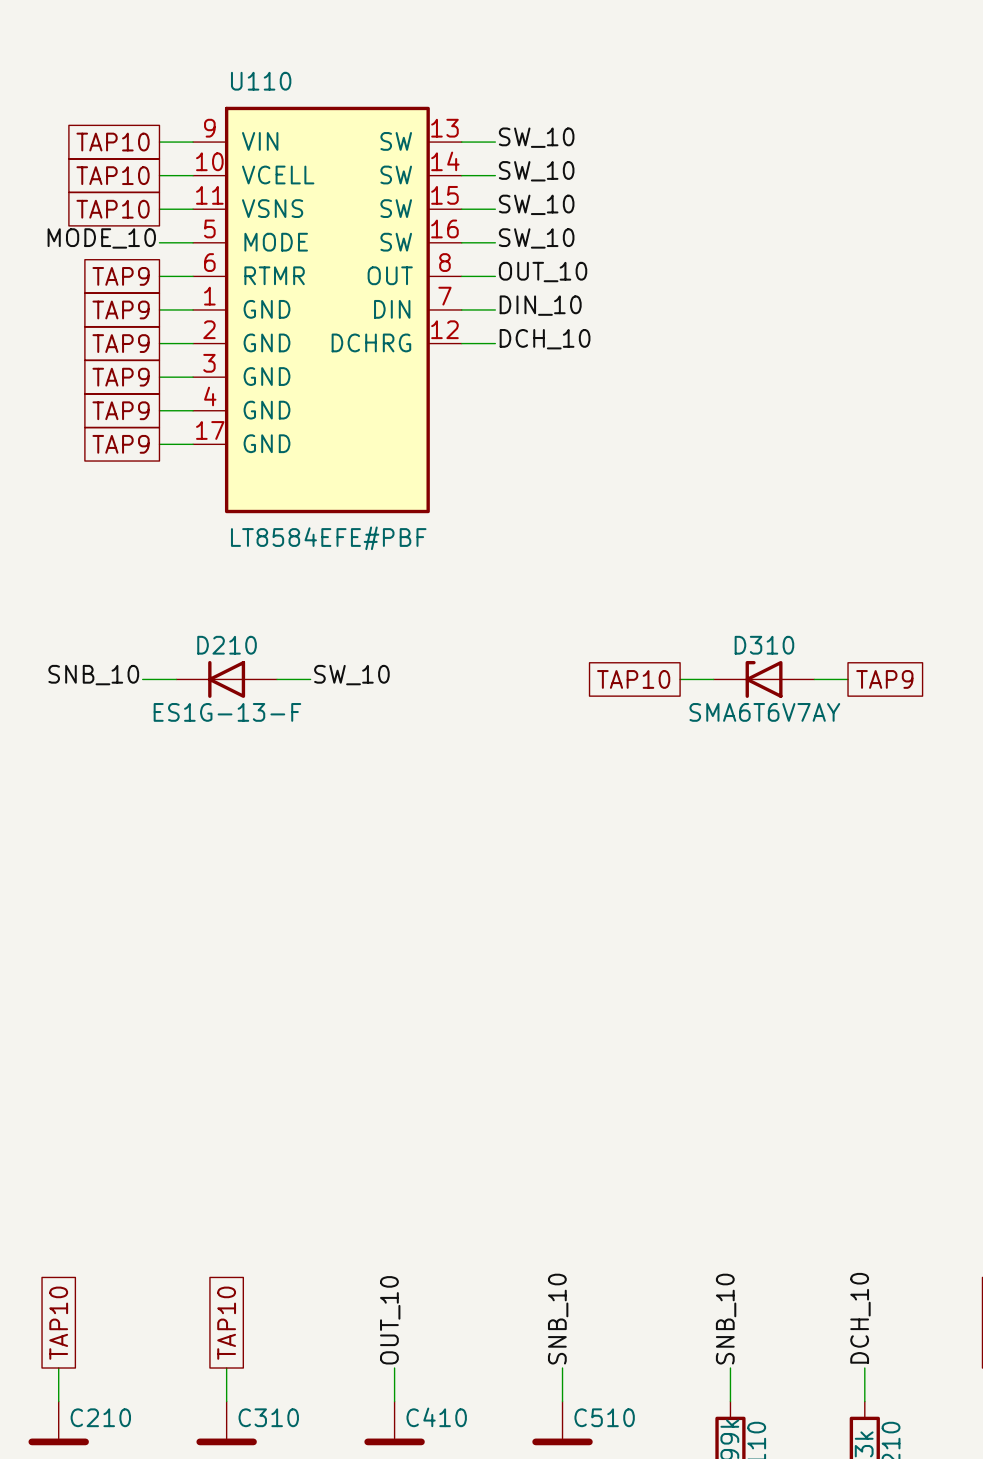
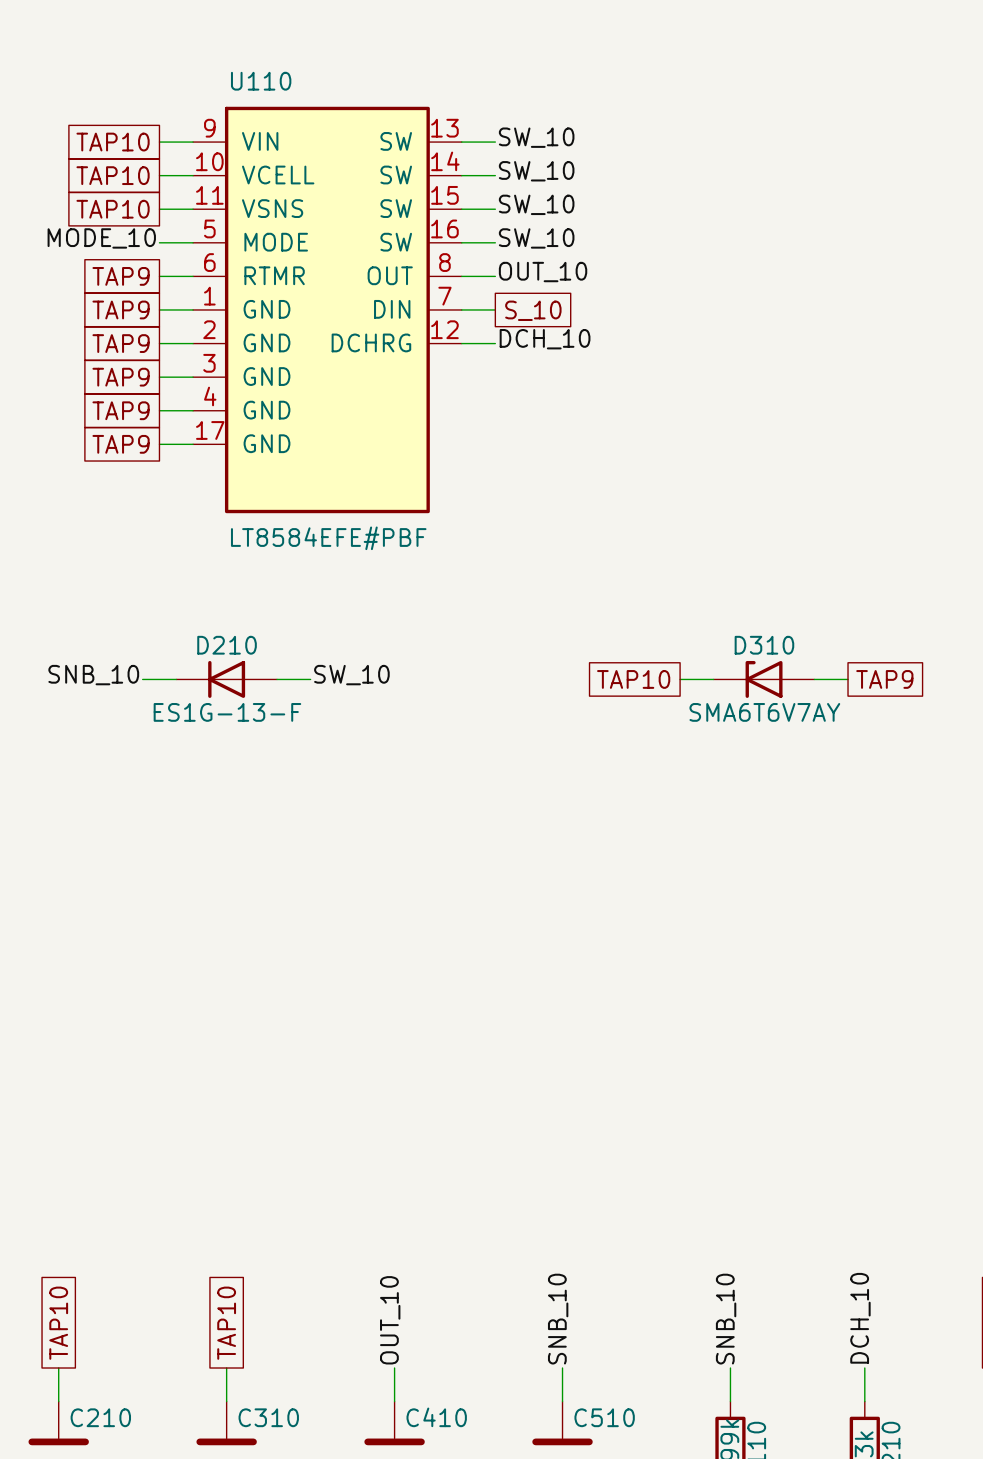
label: DIN_10 (540, 305) -> none
global label: none -> S_10 (533, 310)

